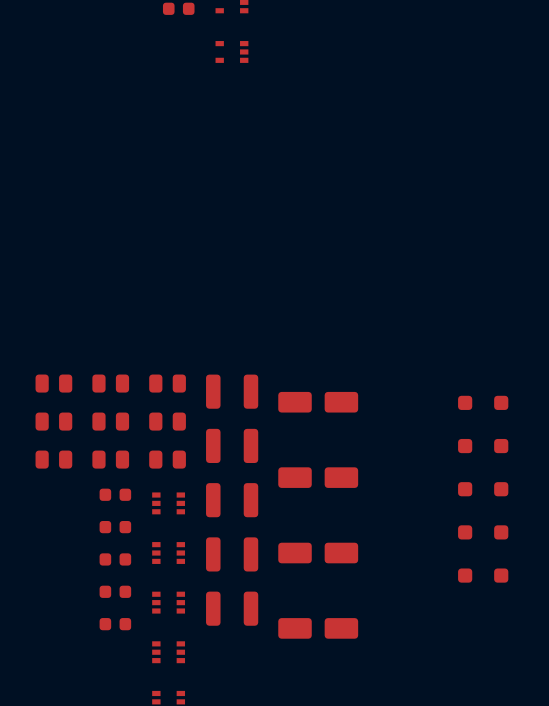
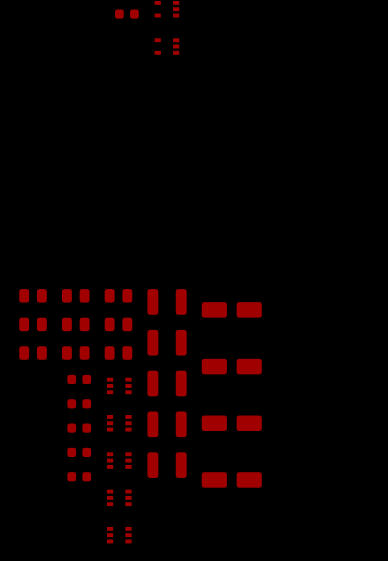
part: (483, 402) -> none
part: (483, 446) -> none
part: (483, 489) -> none
part: (483, 532) -> none
part: (483, 575) -> none

